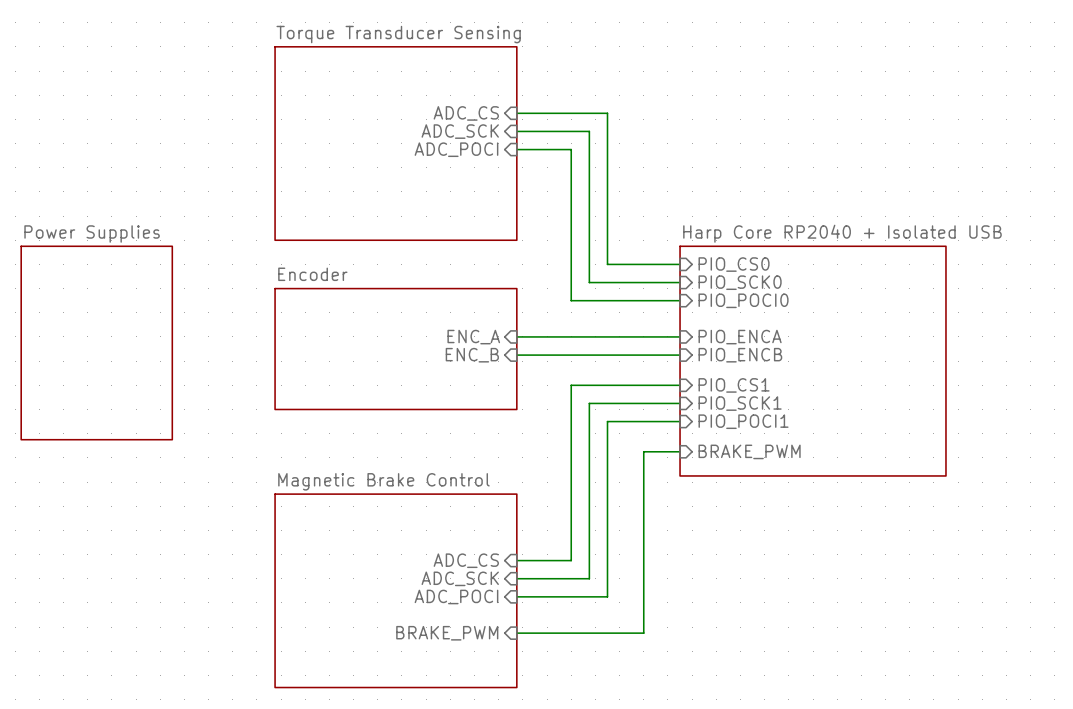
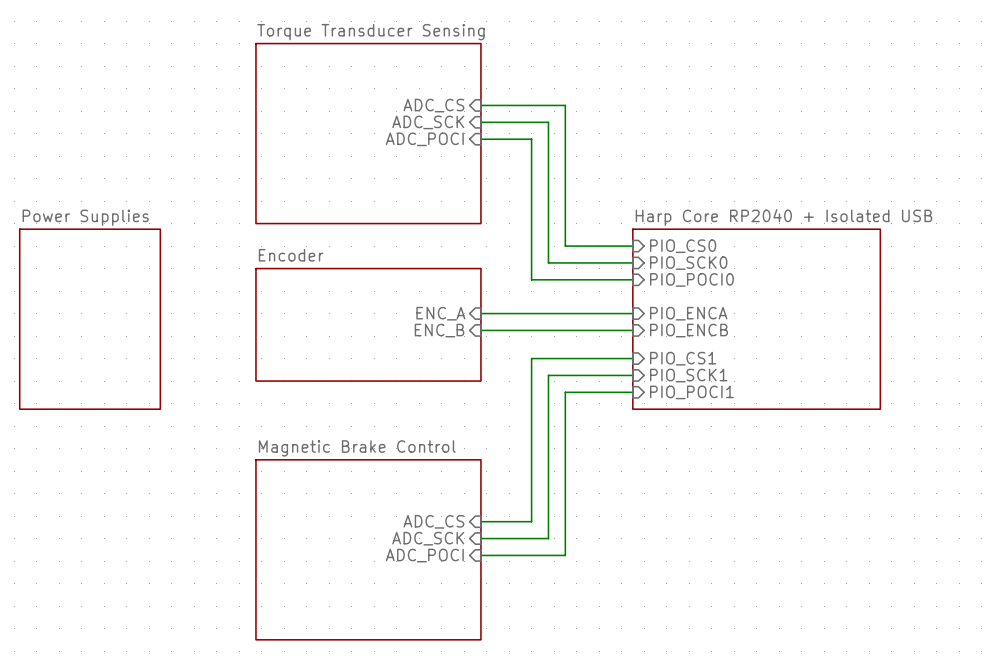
sheet Harp Core RP2040 + Isolated USB shape: [679, 245, 947, 477] -> [632, 228, 882, 410]
wire: (680, 451) (643, 451) (643, 633) (516, 633) -> none
sheet pin: BRAKE_PWM (749, 451) -> none
sheet pin: BRAKE_PWM (447, 633) -> none

